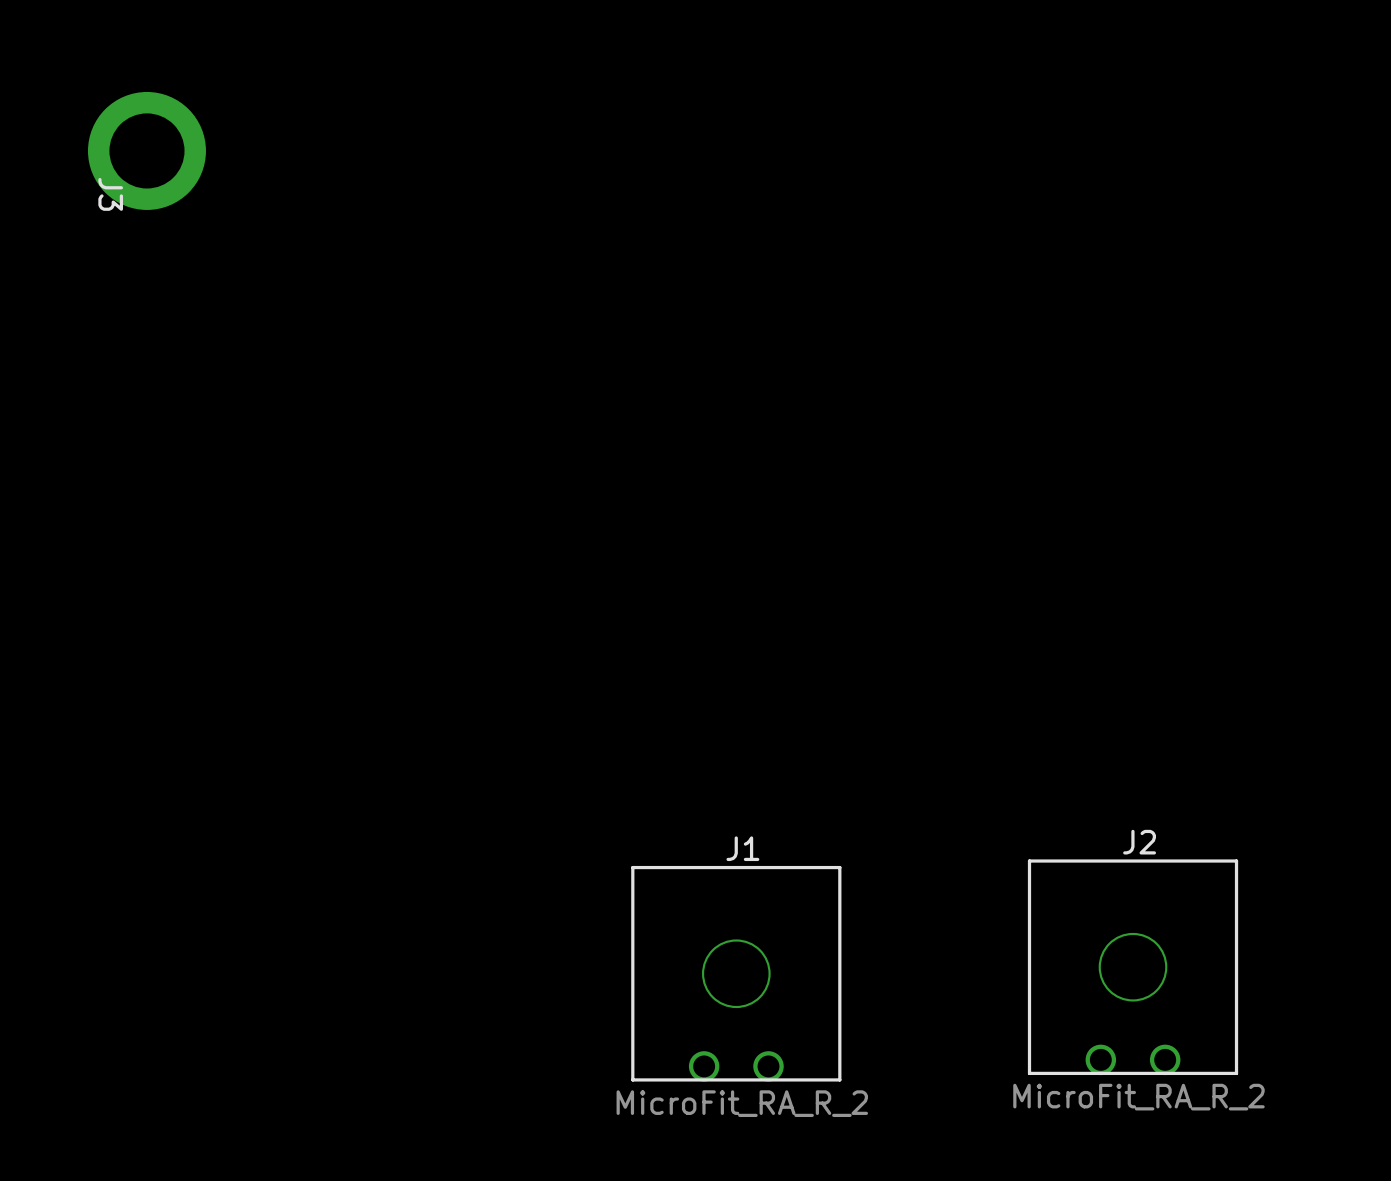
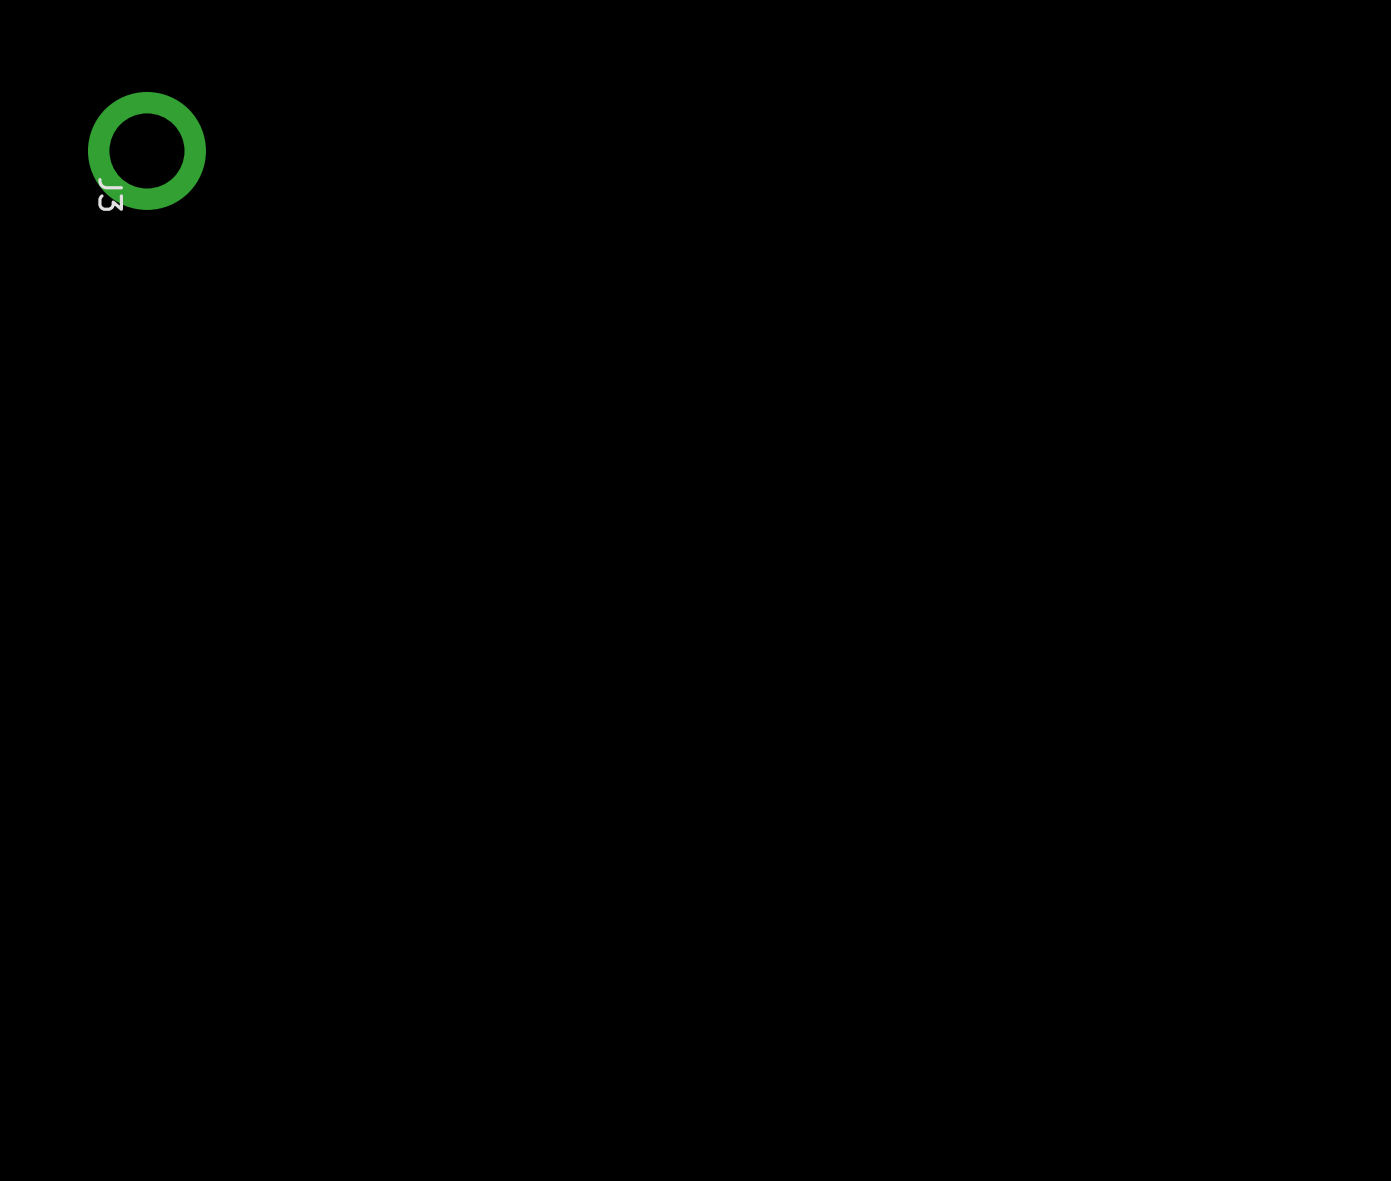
J2: MicroFit_RA_R_2 (1133, 967) -> none
J1: MicroFit_RA_R_2 (736, 973) -> none

